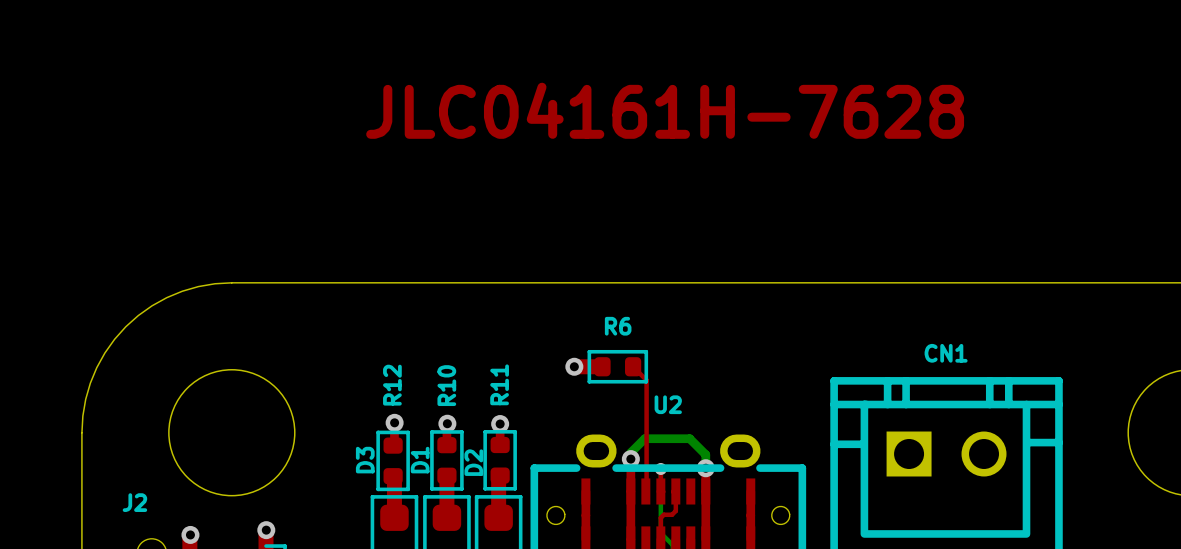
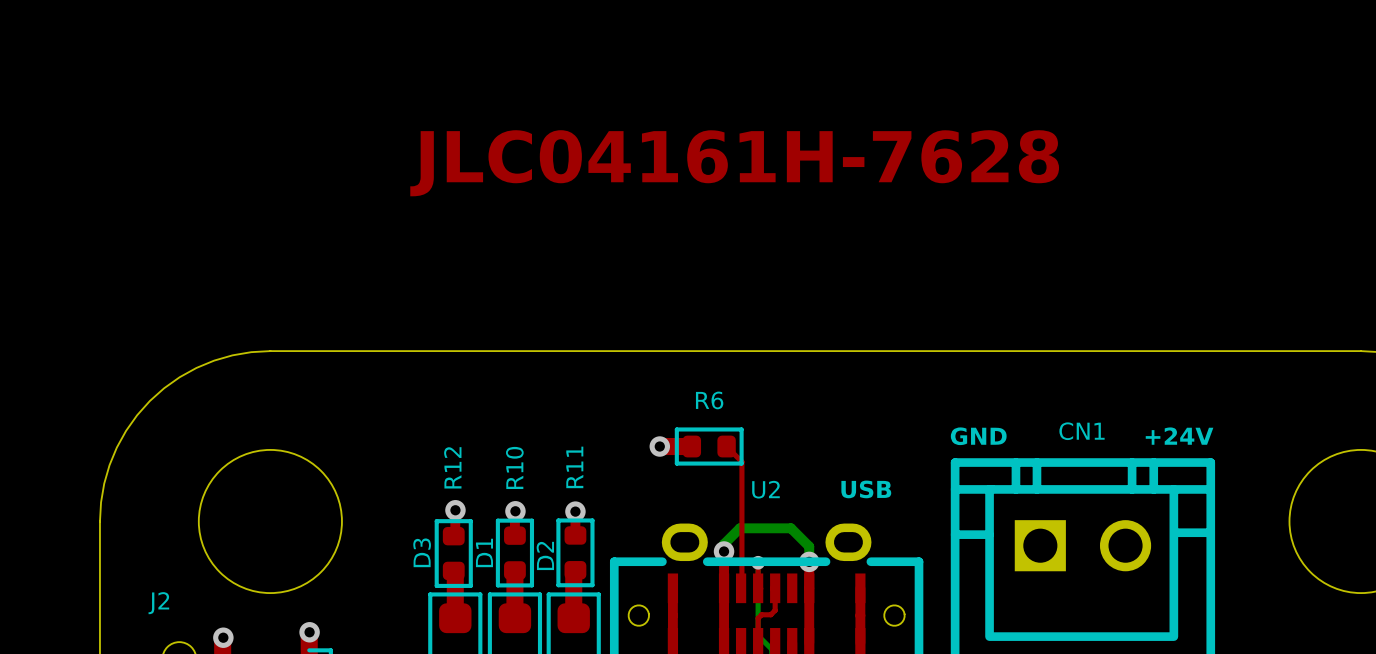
text: none -> GND (978, 436)
text: none -> +24V (1179, 436)
text: none -> USB (866, 489)

